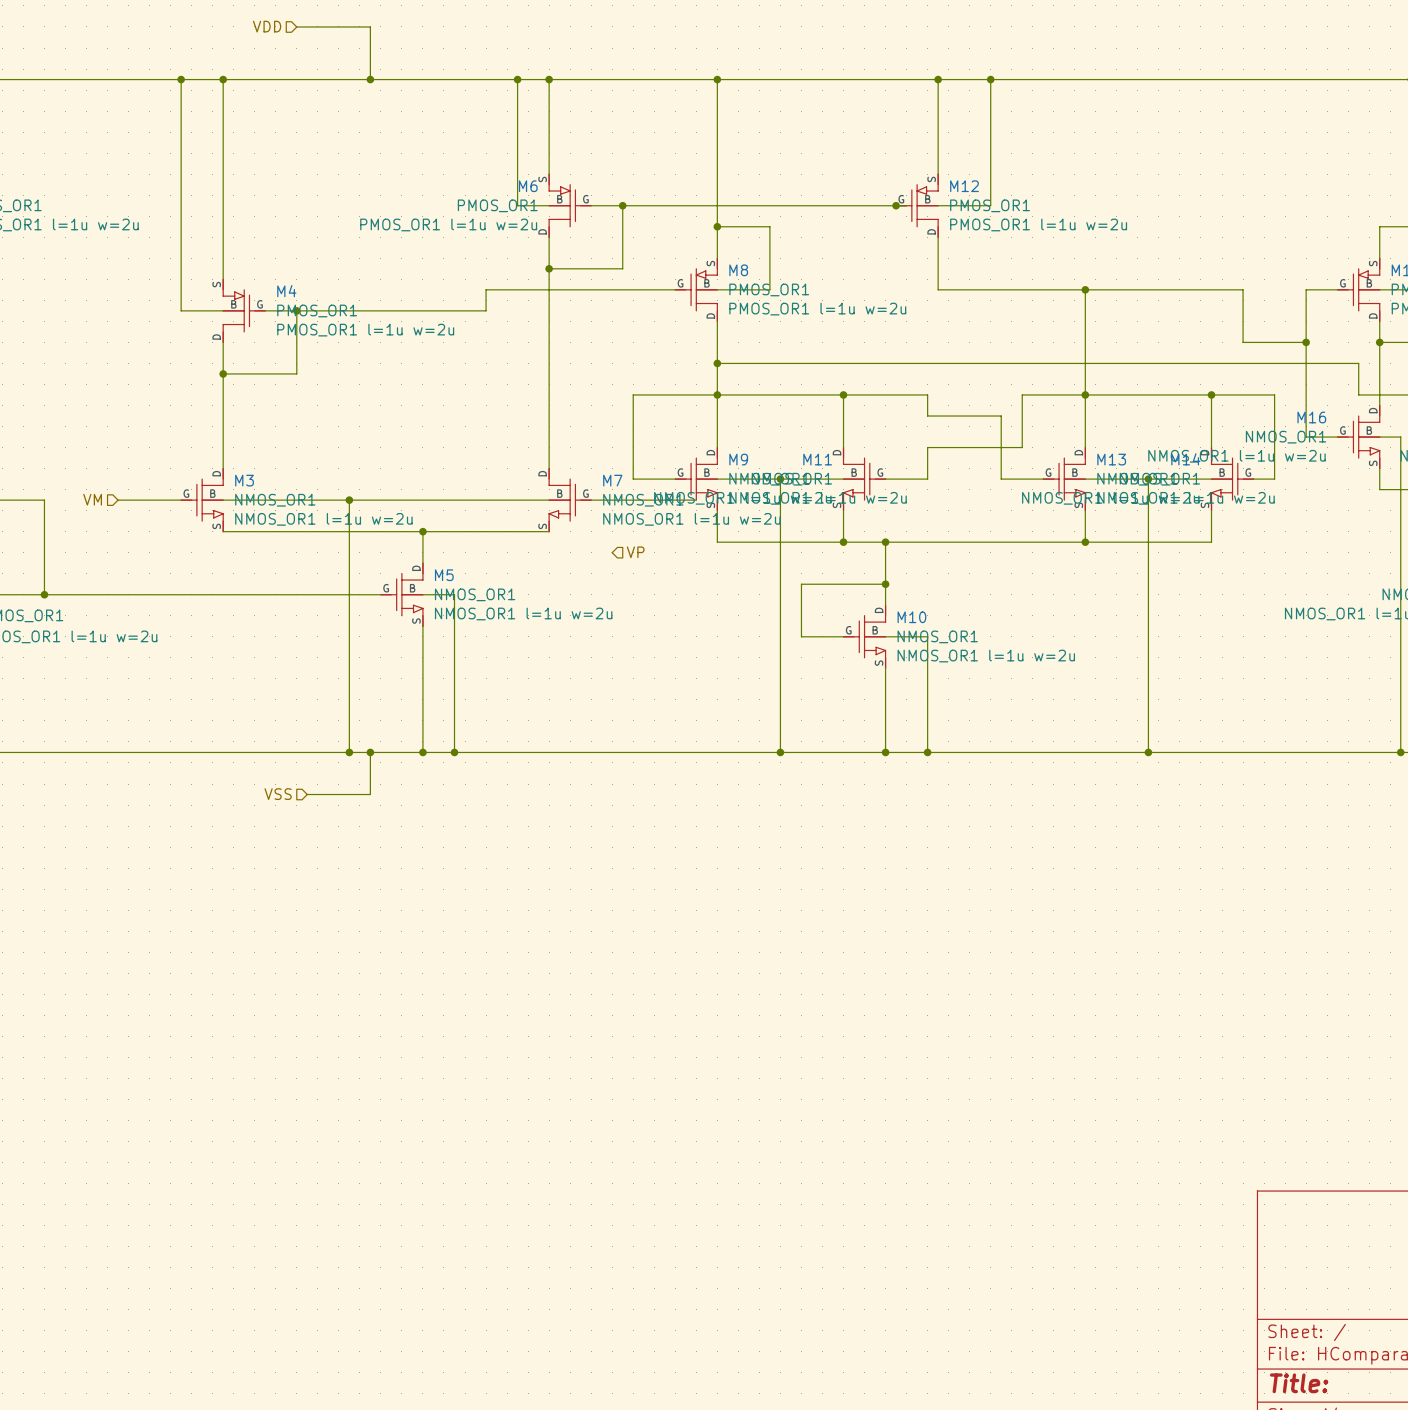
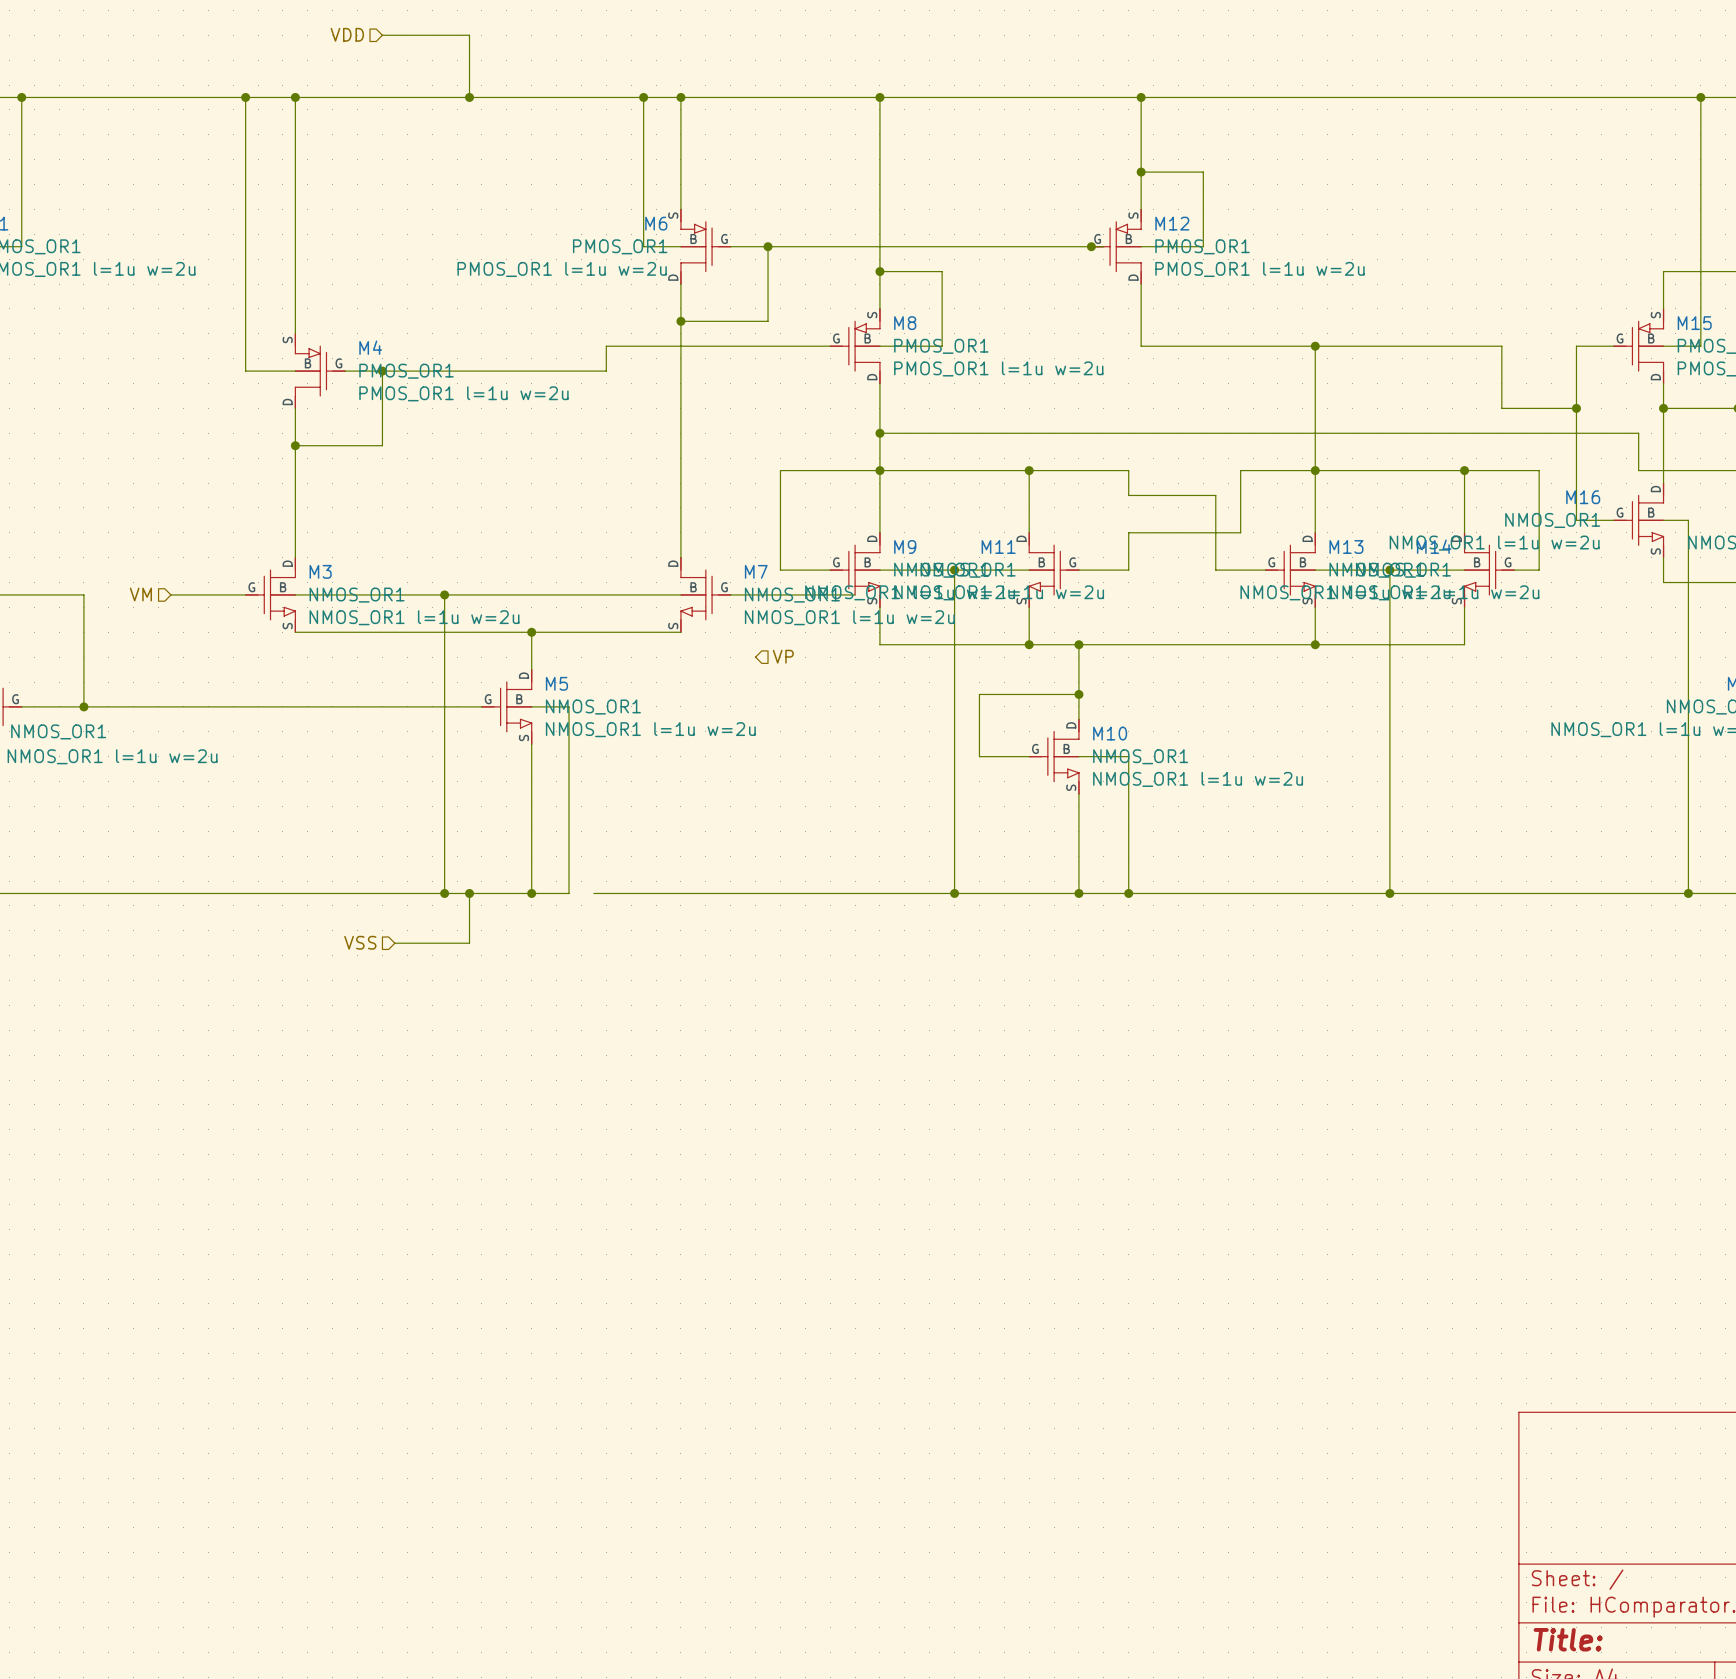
wire: (990, 79) (990, 142) -> (1141, 172) (1203, 172)
junction: (990, 79) -> none
junction: none -> (1141, 172)
wire: (454, 752) (475, 752) -> none
junction: (454, 752) -> none

